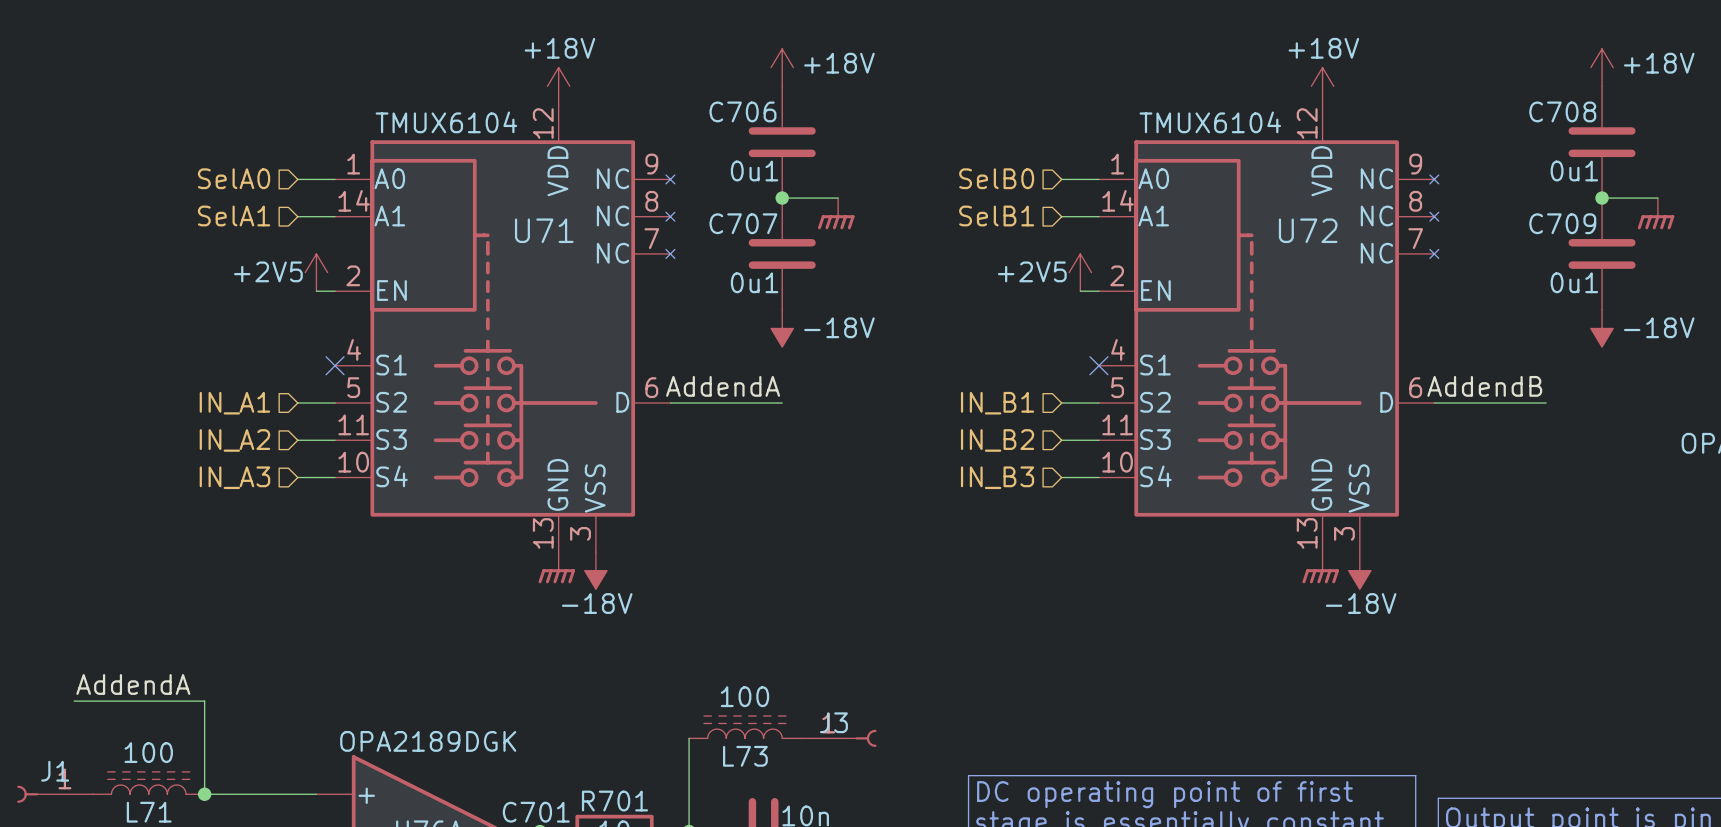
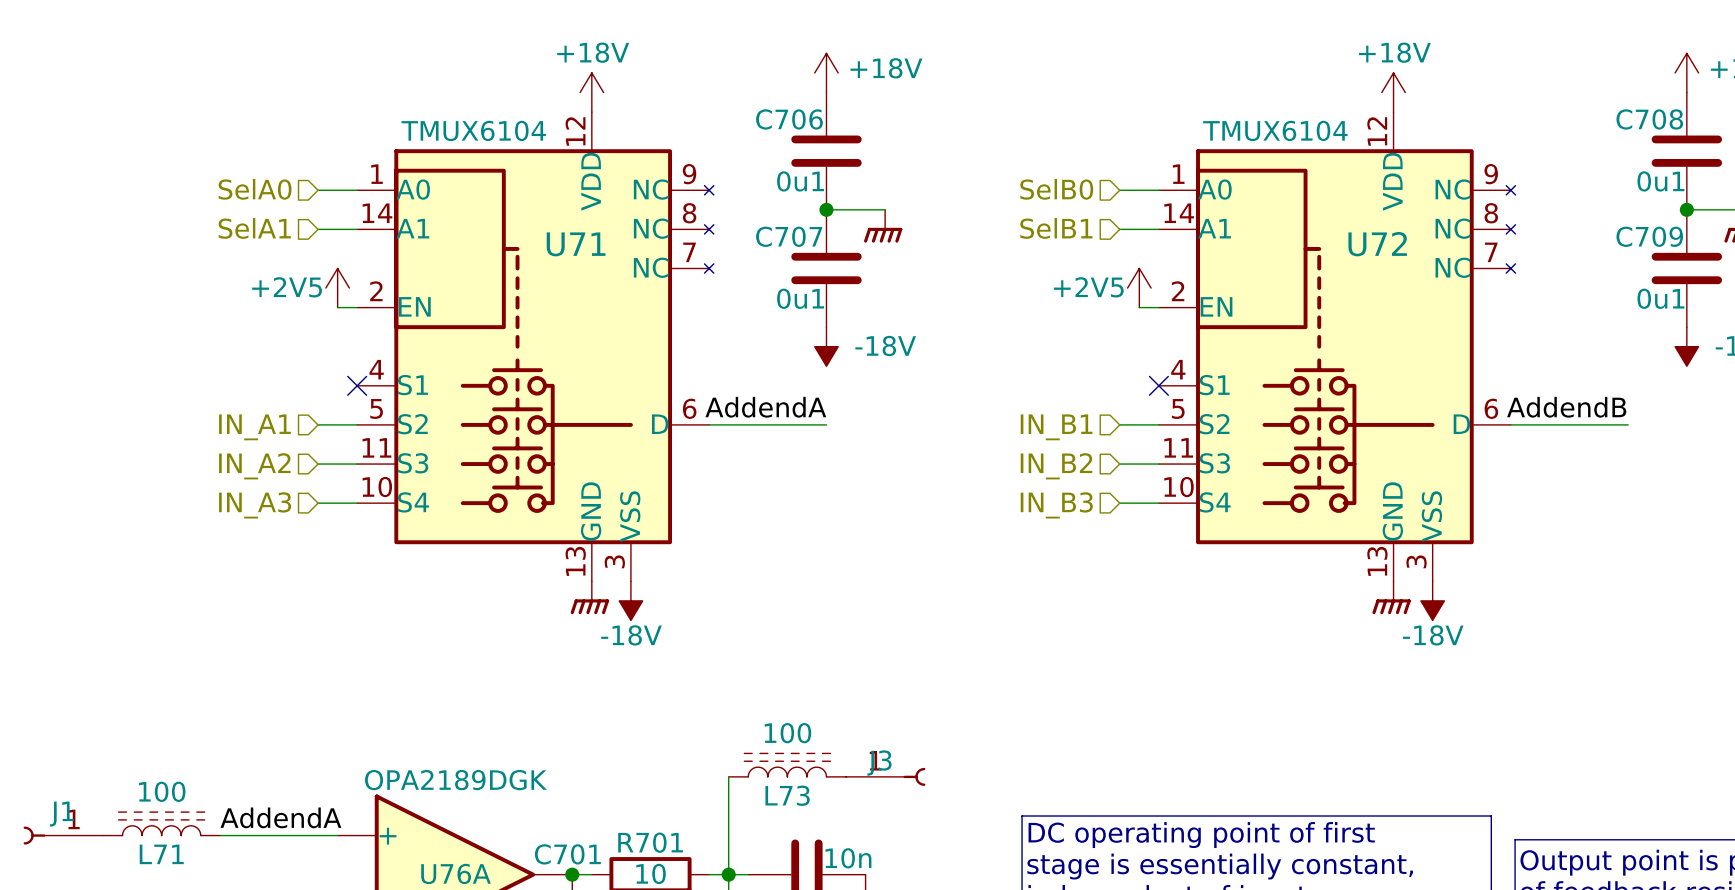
label position: AddendA (133, 684) -> AddendA (280, 817)
wire: (74, 701) (204, 701) (204, 794) -> none
junction: (204, 794) -> none

